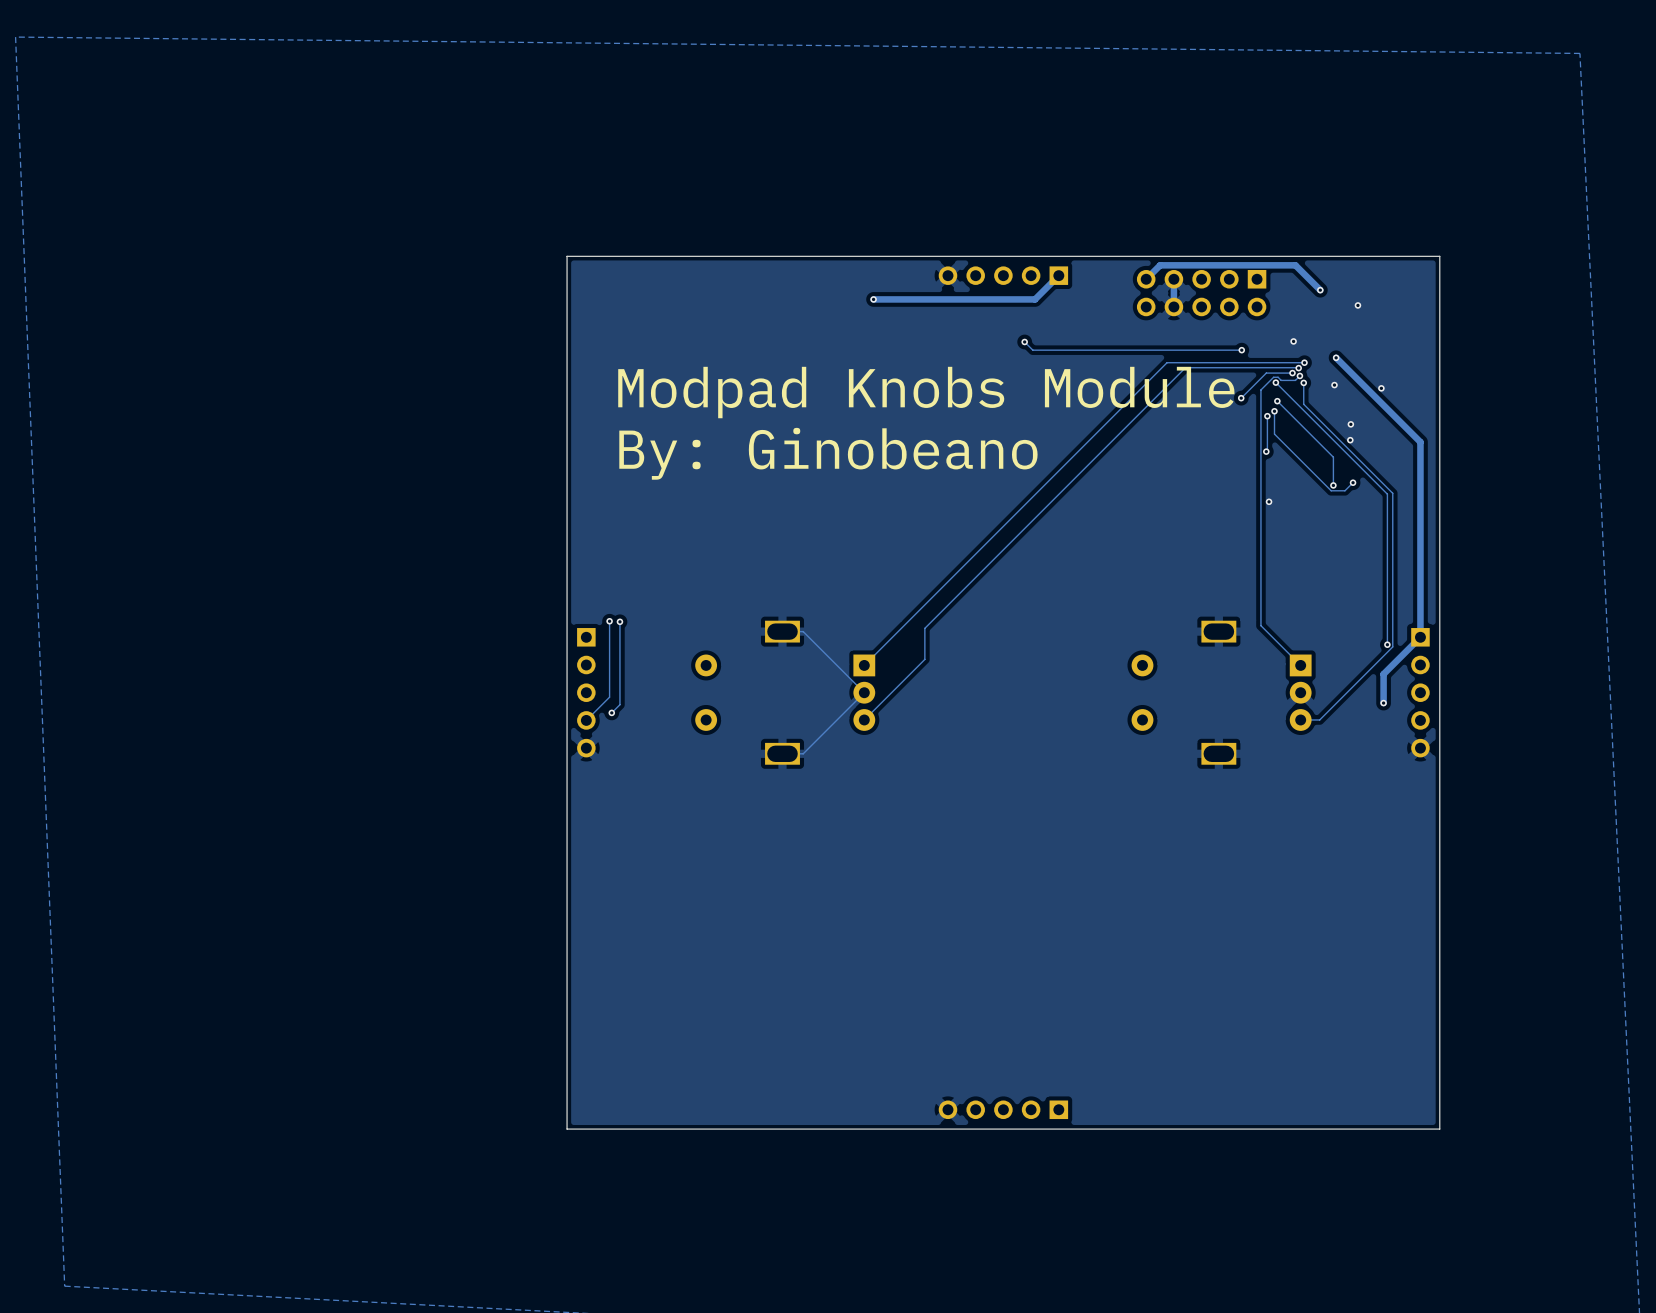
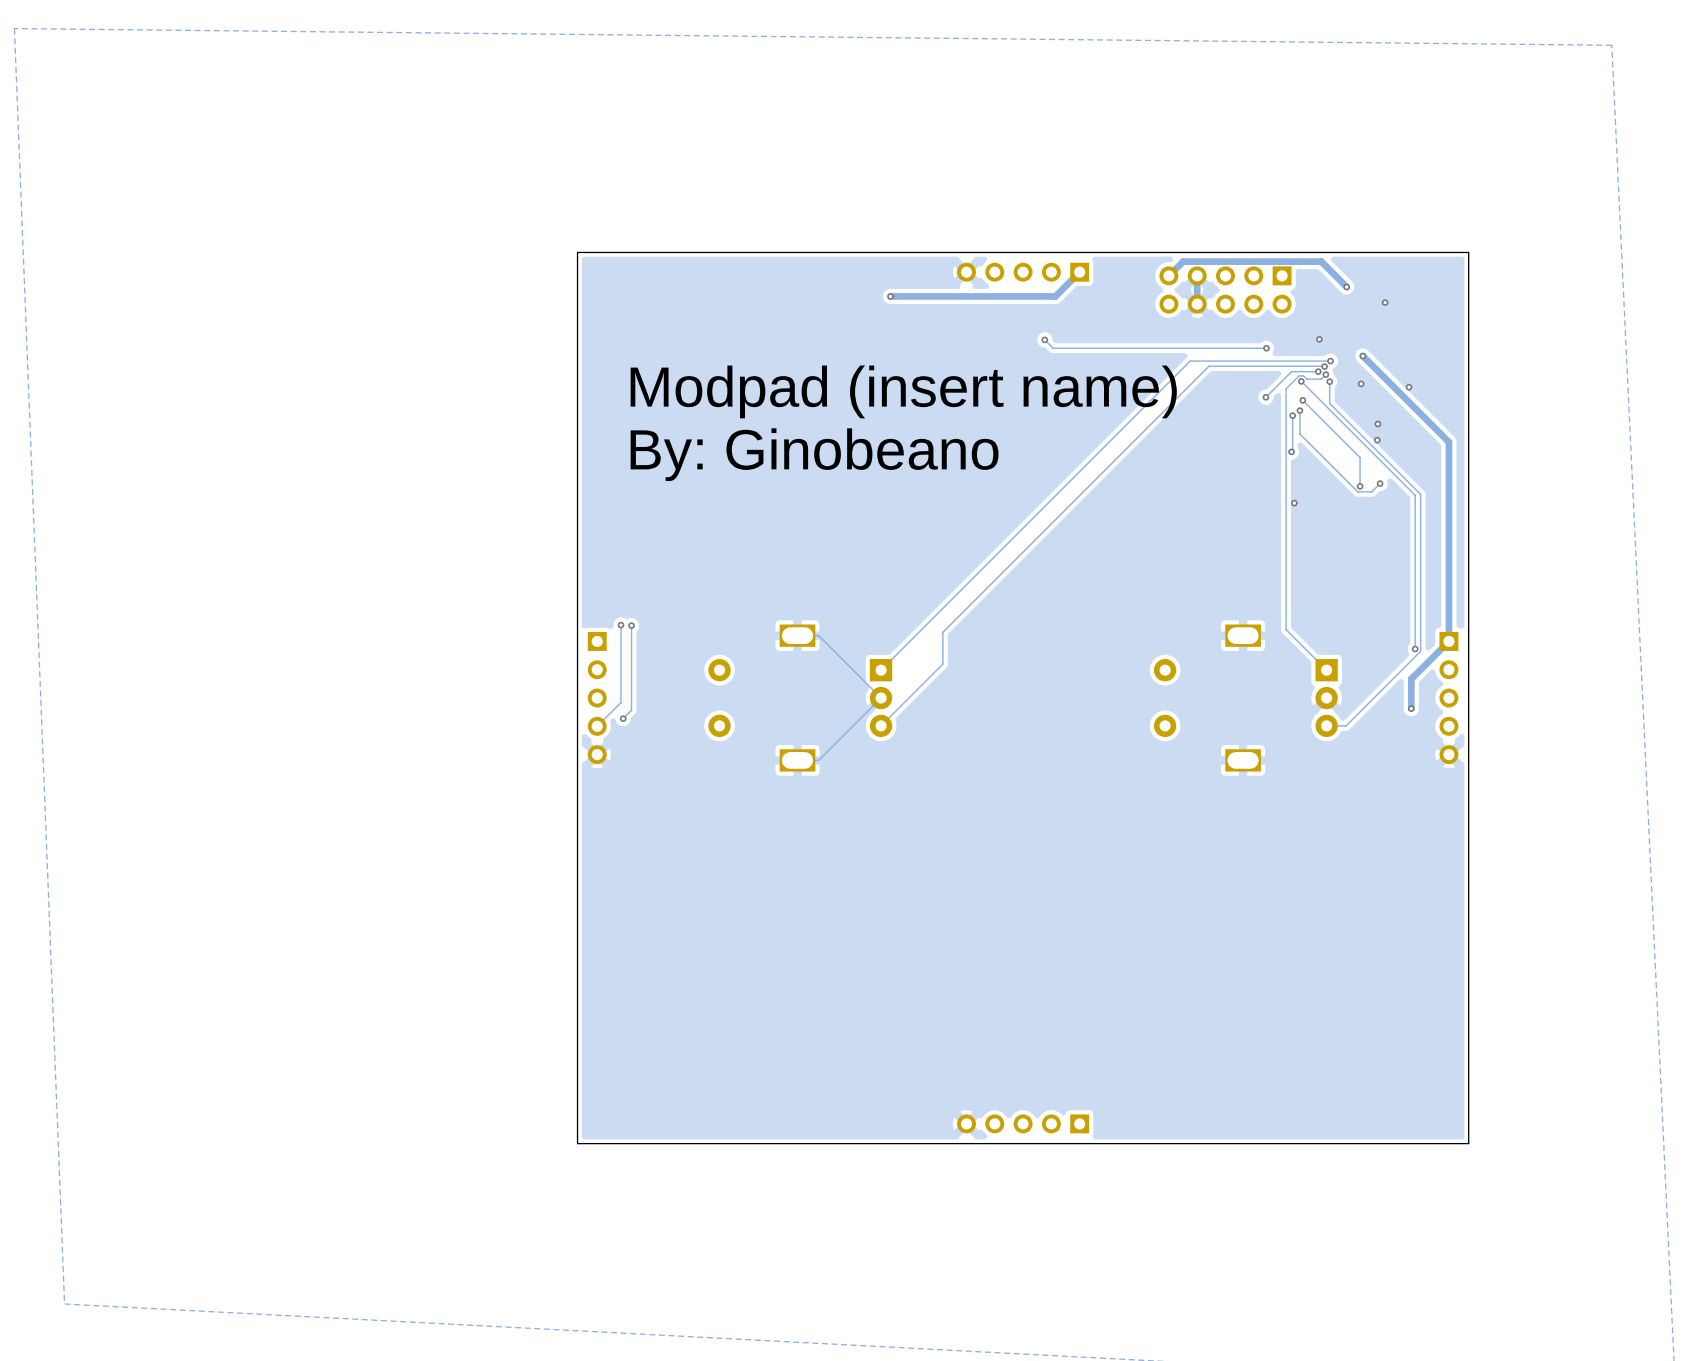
text: Modpad Knobs Module (926, 392) -> Modpad (insert name) (903, 391)

